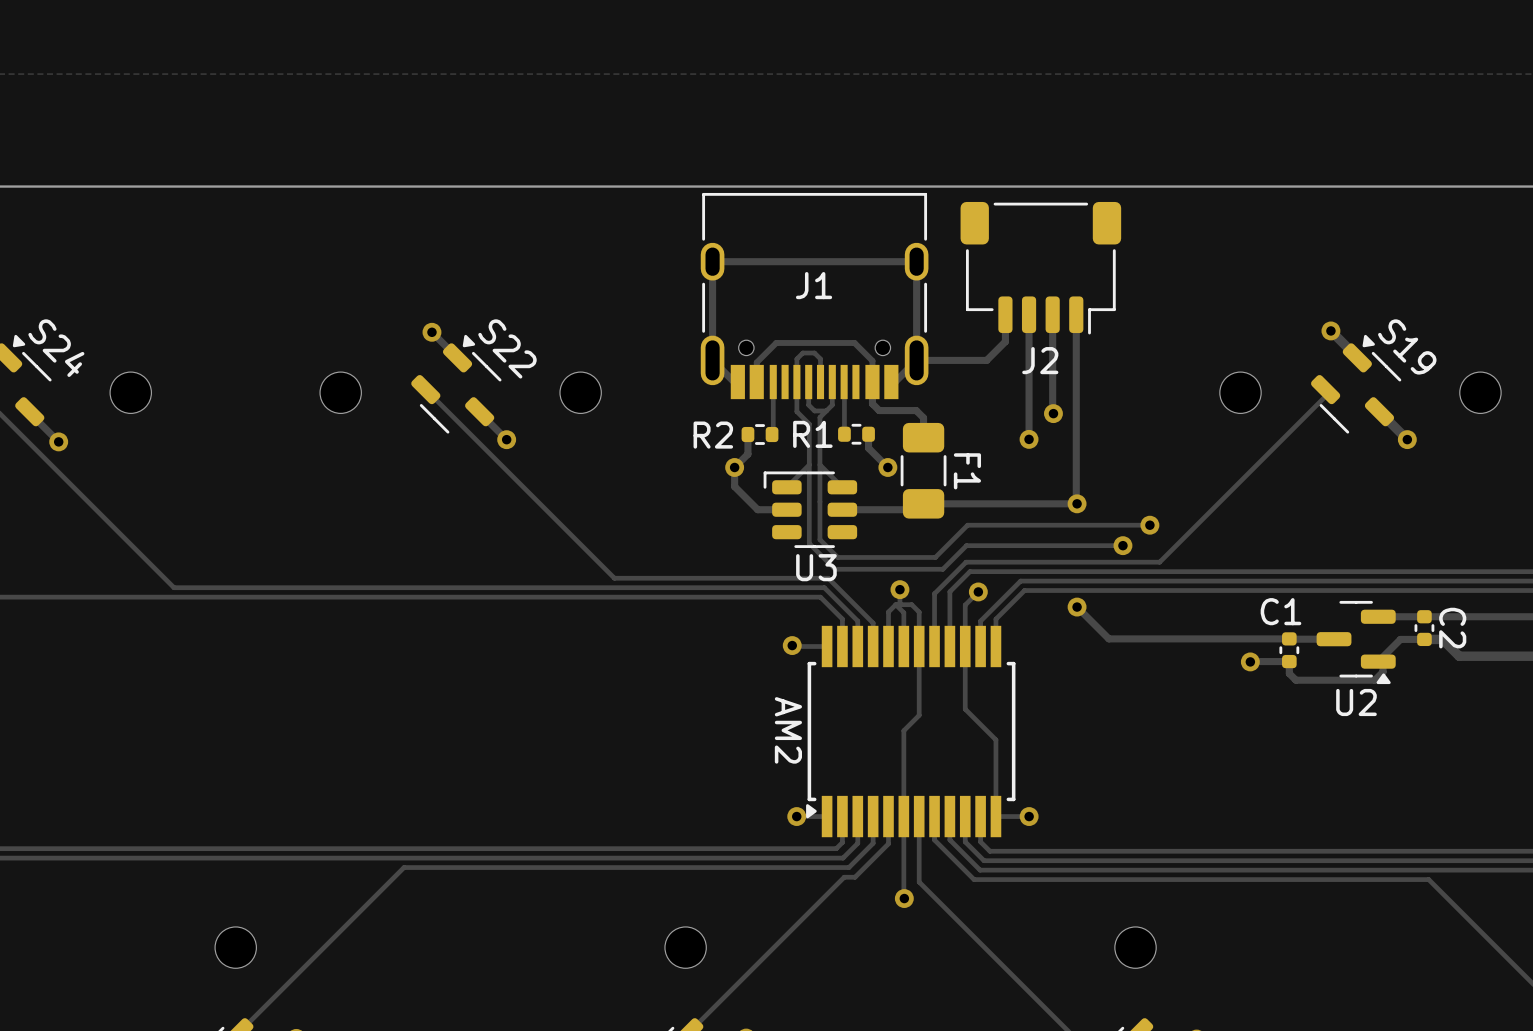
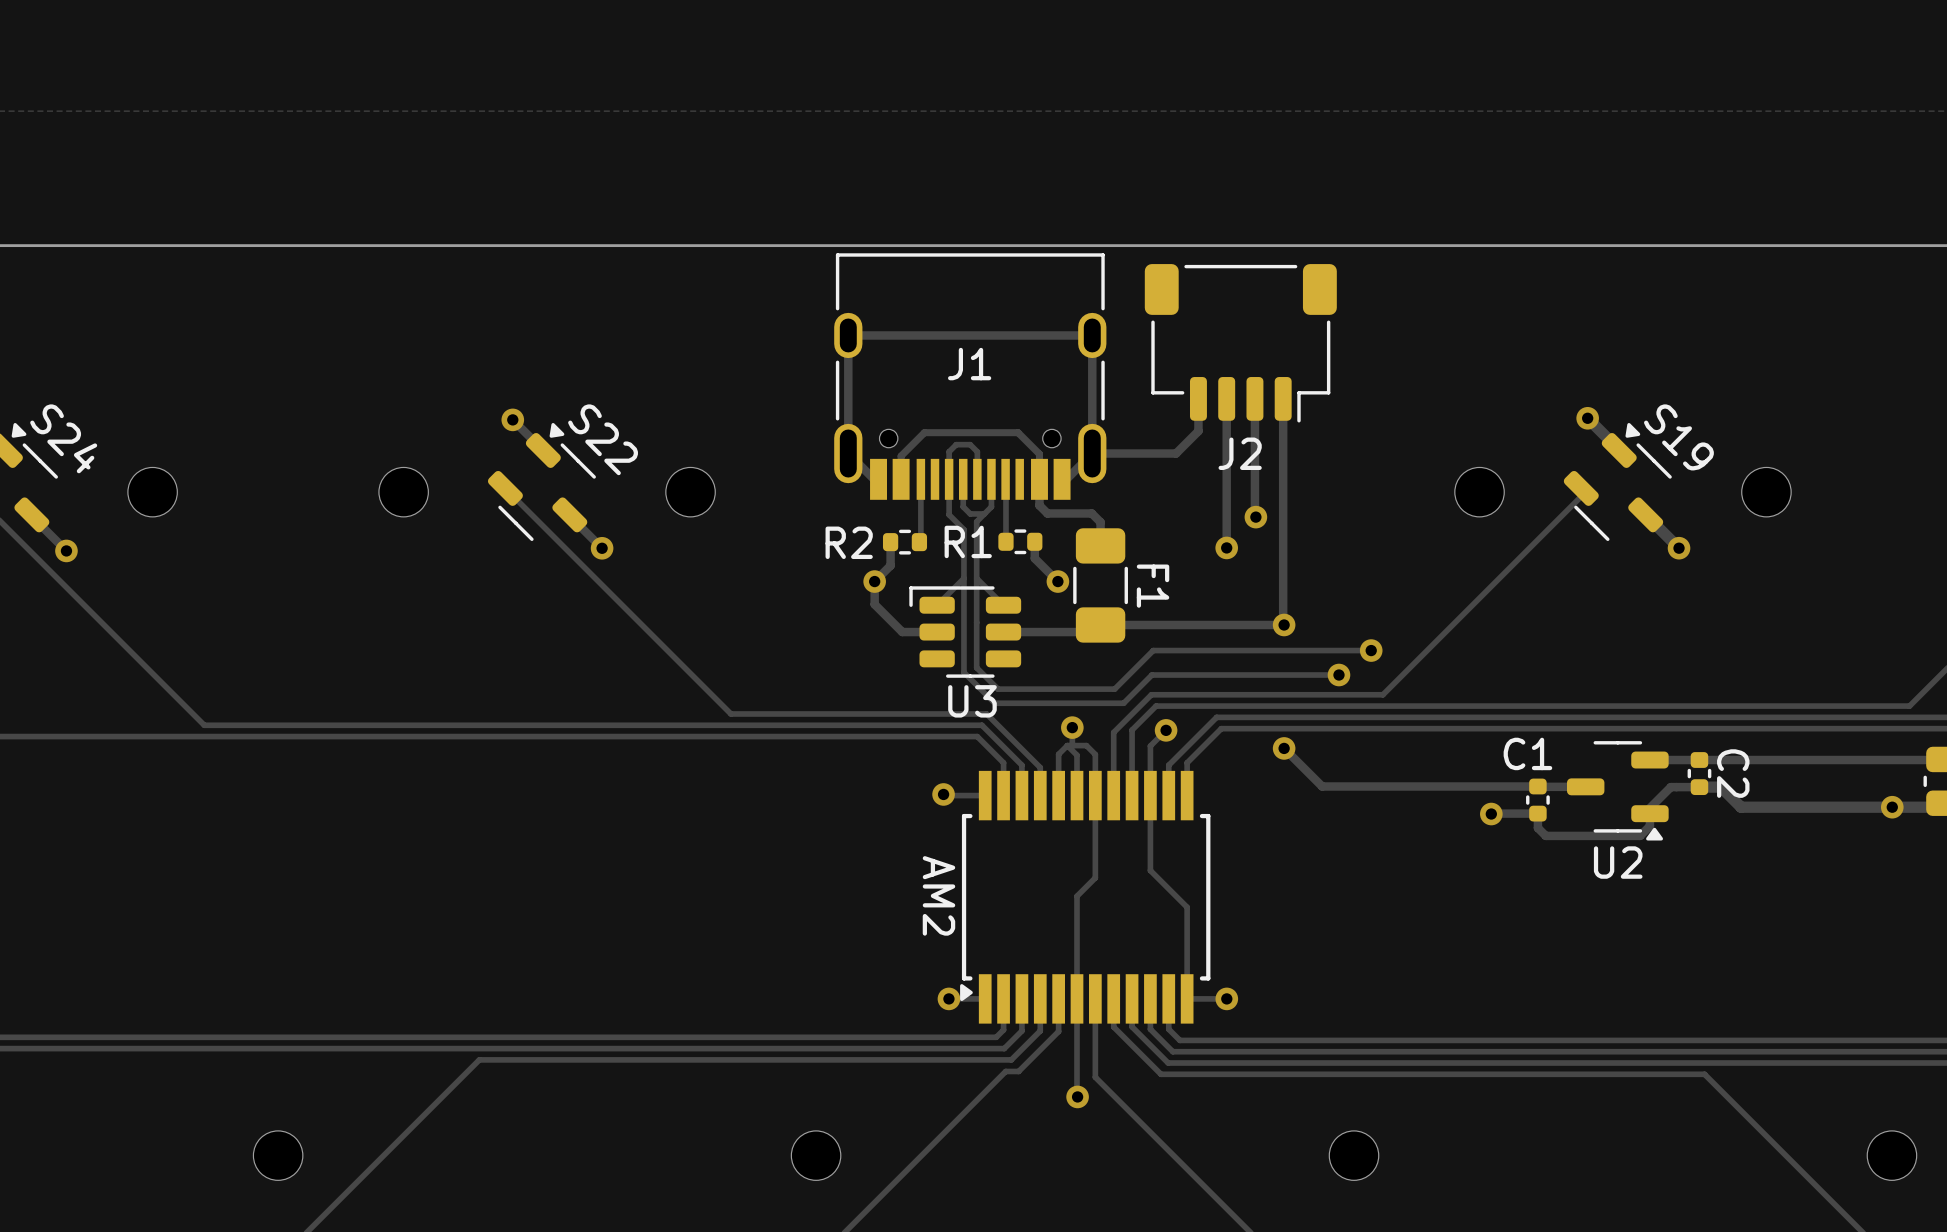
U2 footprint: [1316, 600, 1396, 685] -> [1567, 741, 1669, 841]

